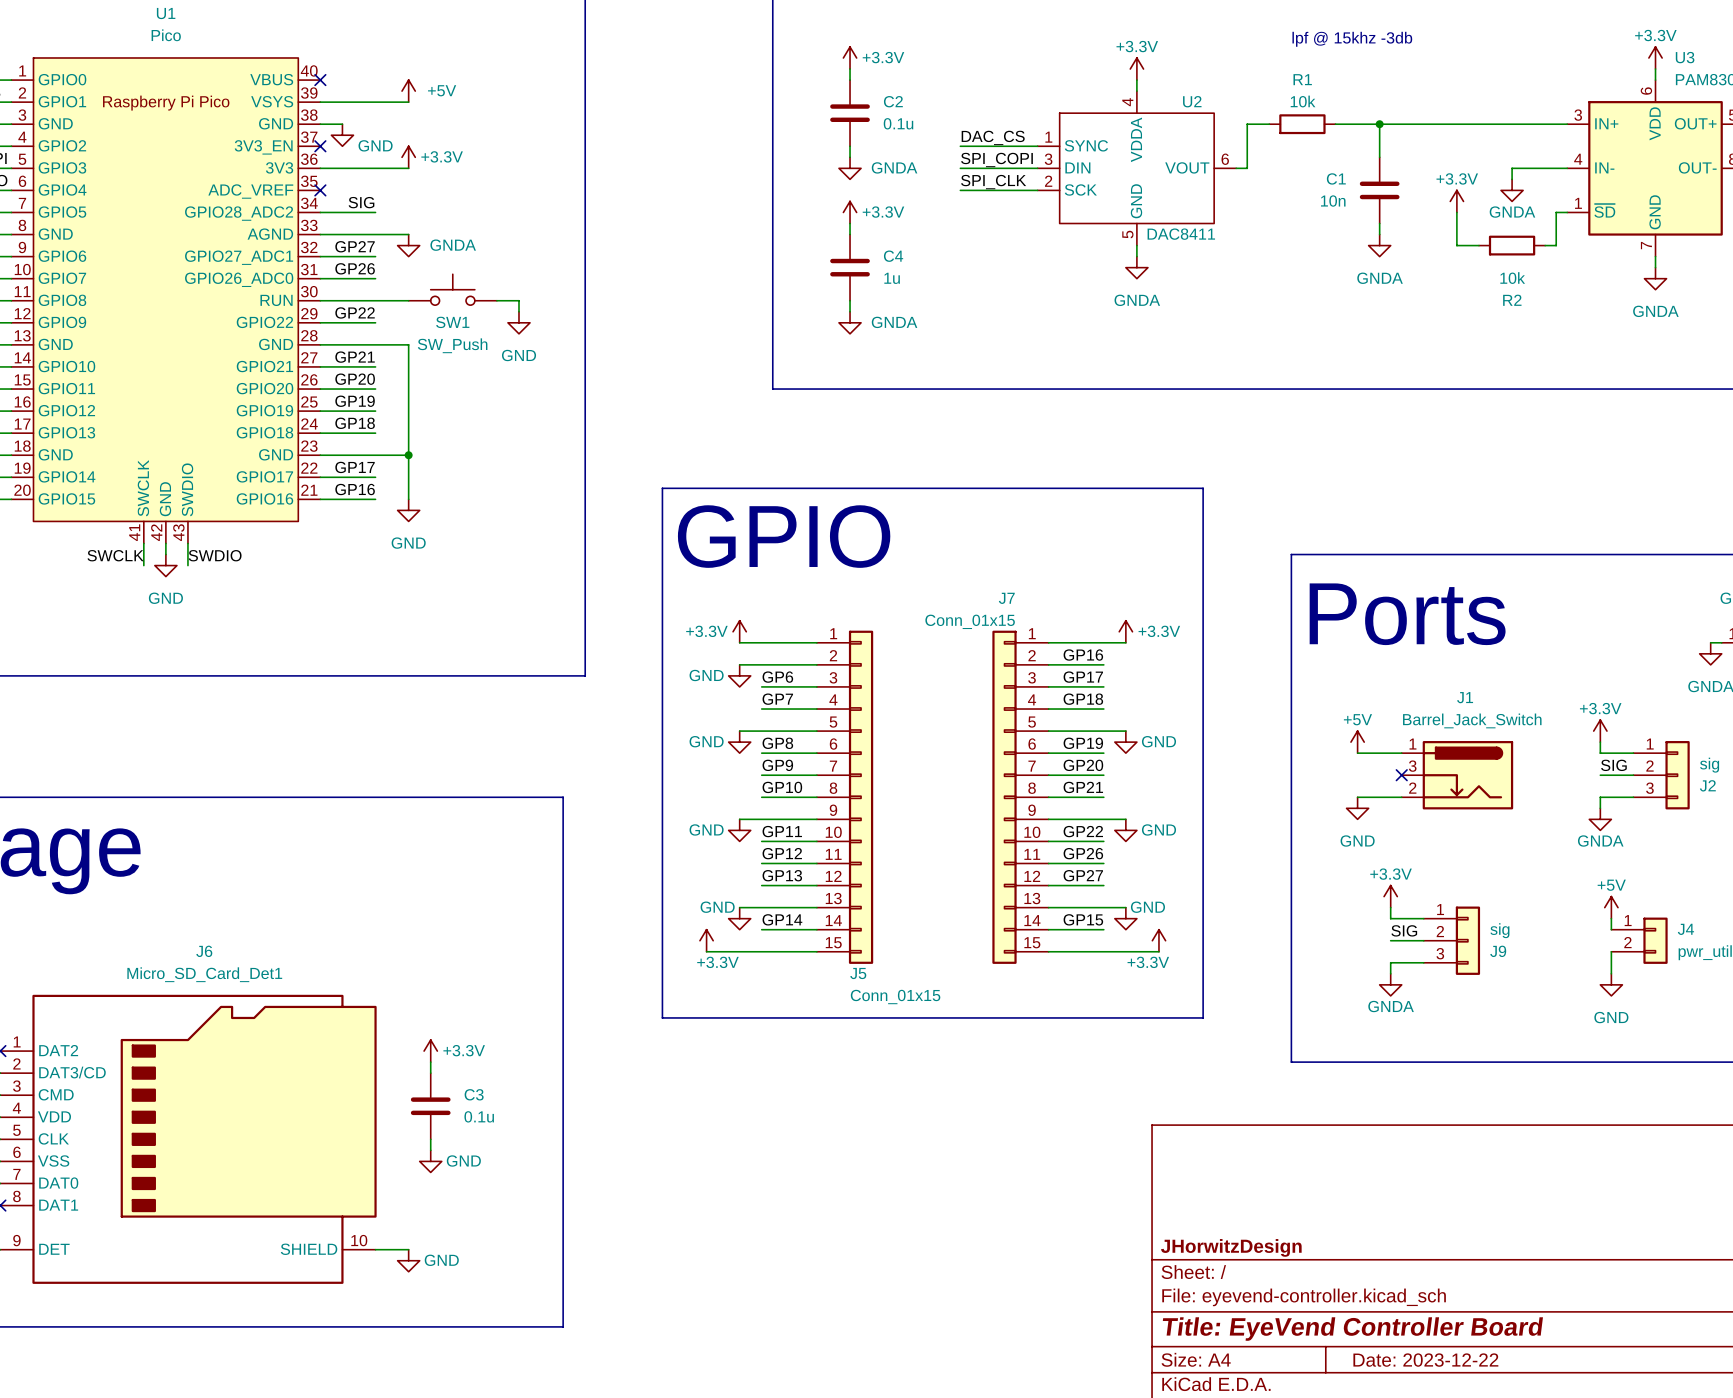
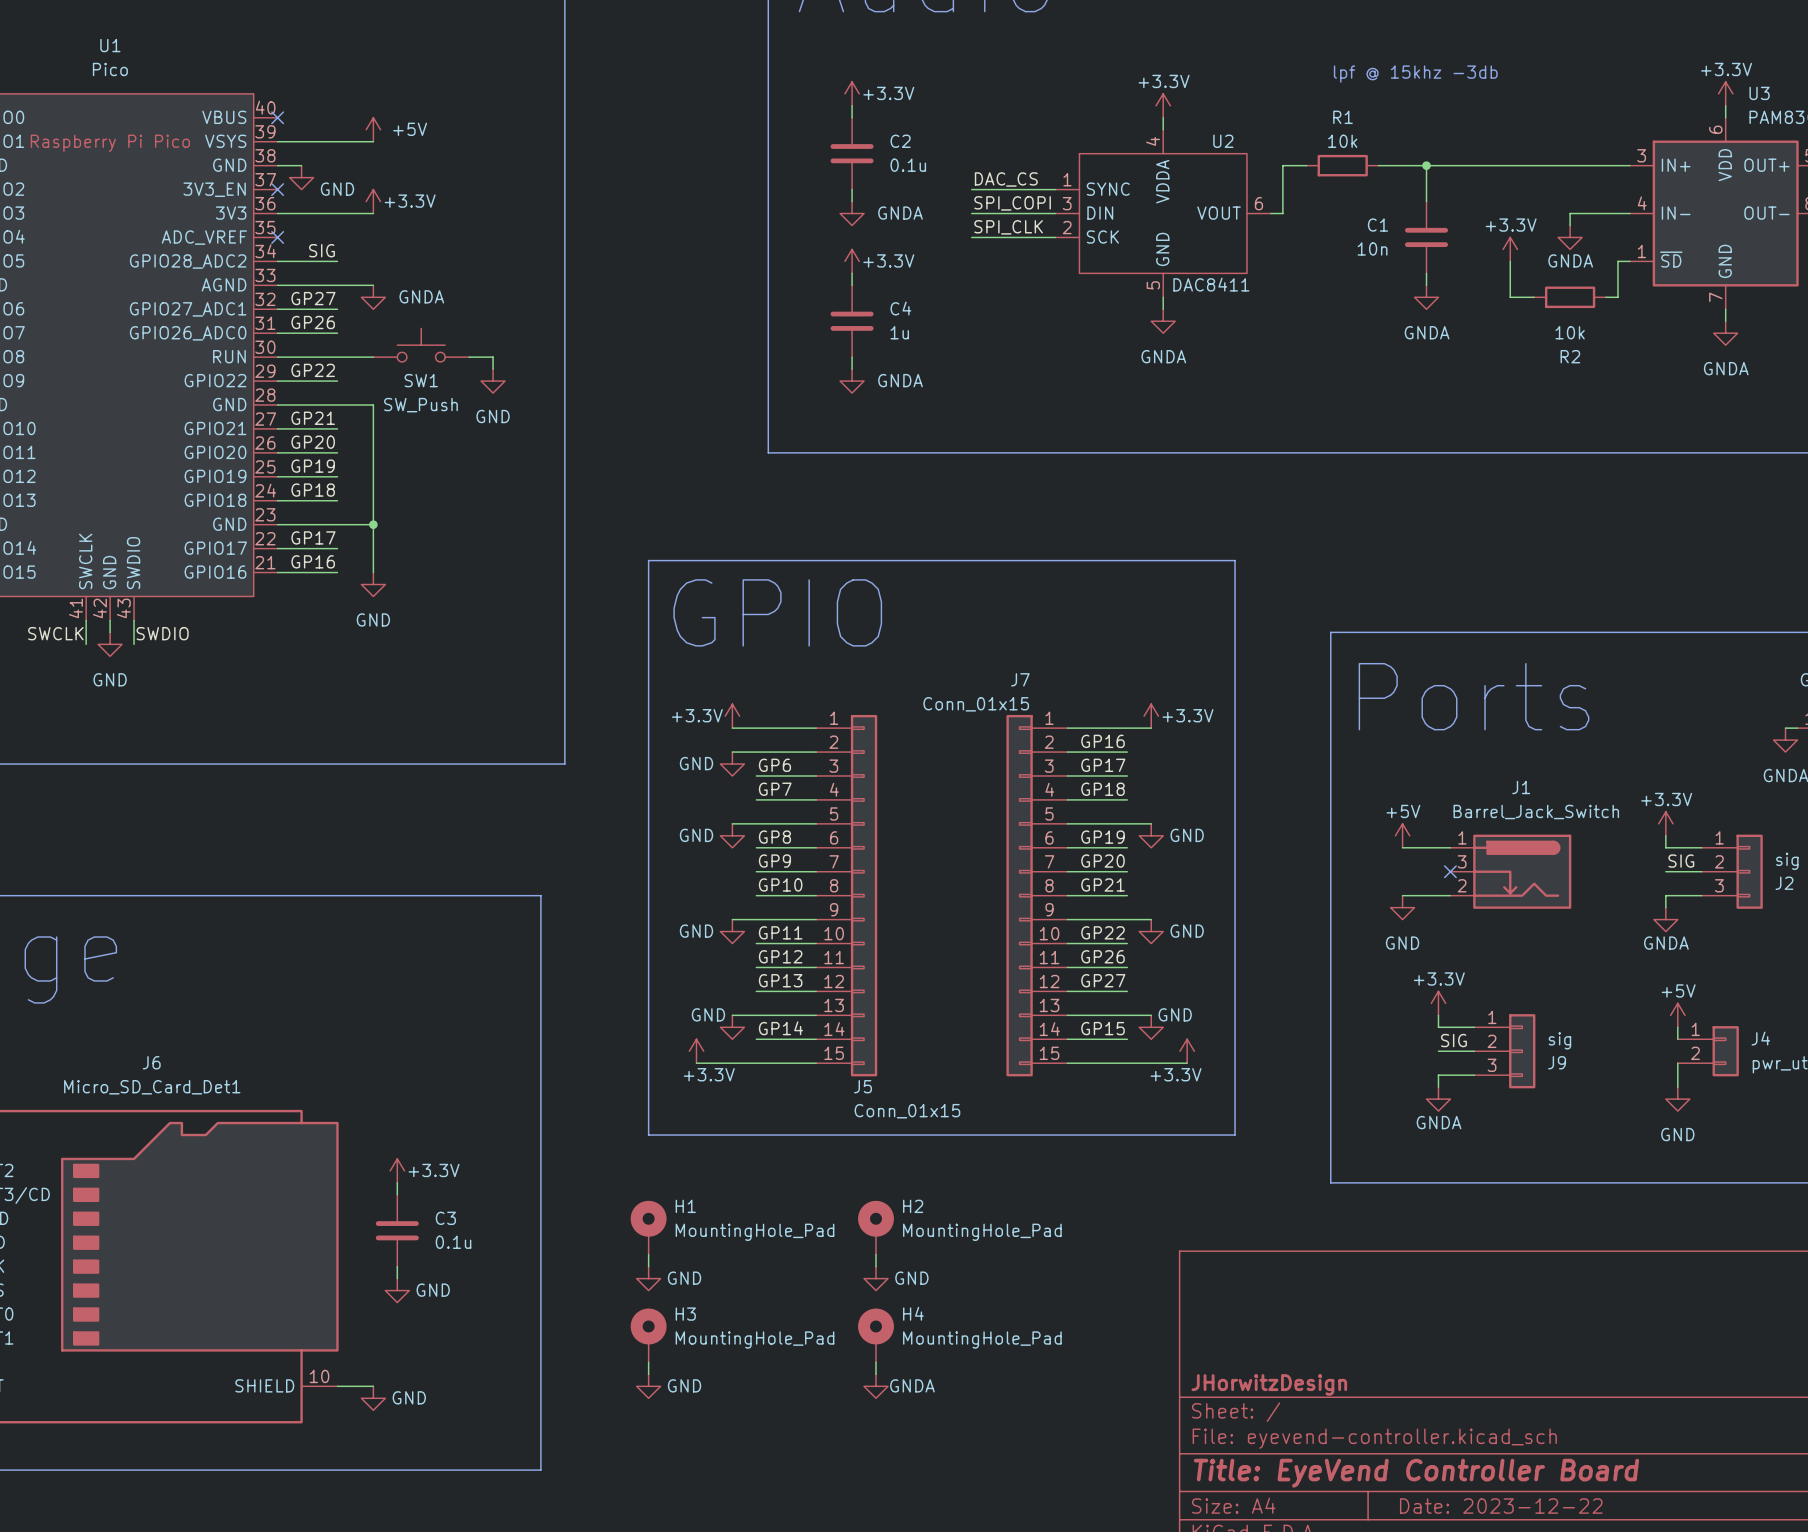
H1: none -> MountingHole_Pad (648, 1227)
H2: none -> MountingHole_Pad (876, 1227)
wire: none -> (648, 1254) (648, 1266)
wire: none -> (876, 1254) (876, 1266)
power symbol: none -> GND (648, 1278)
power symbol: none -> GND (876, 1278)
H3: none -> MountingHole_Pad (648, 1335)
H4: none -> MountingHole_Pad (876, 1335)
wire: none -> (648, 1362) (648, 1374)
wire: none -> (876, 1362) (876, 1374)
power symbol: none -> GND (648, 1386)
power symbol: none -> GNDA (876, 1386)

